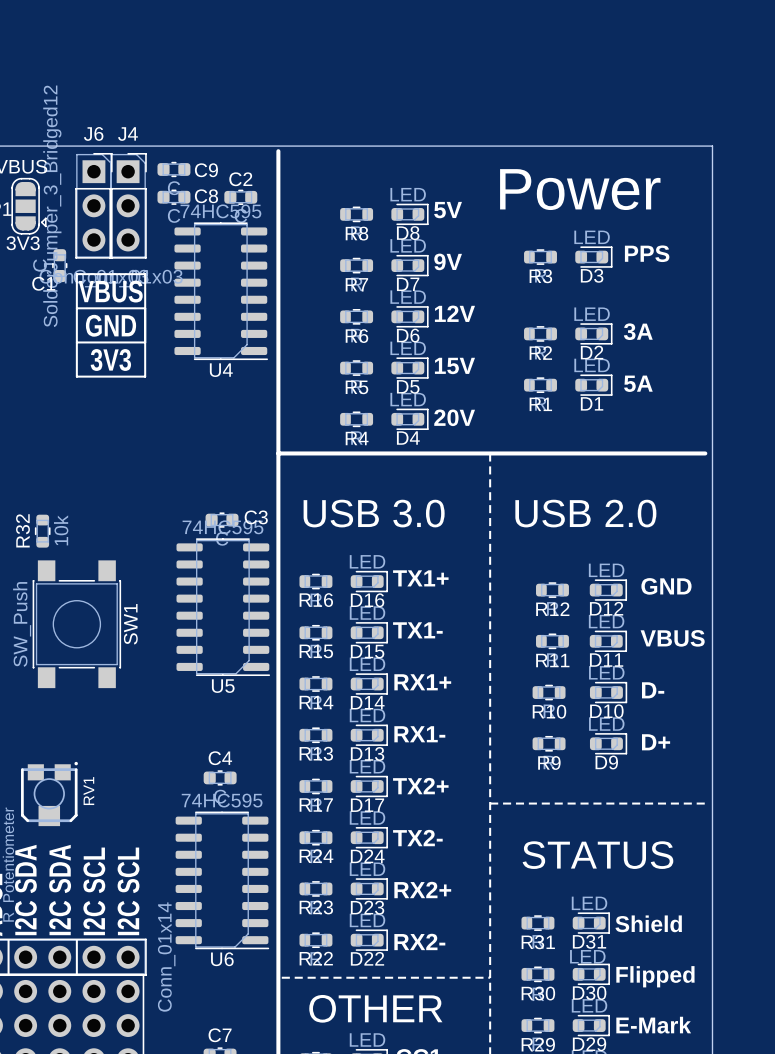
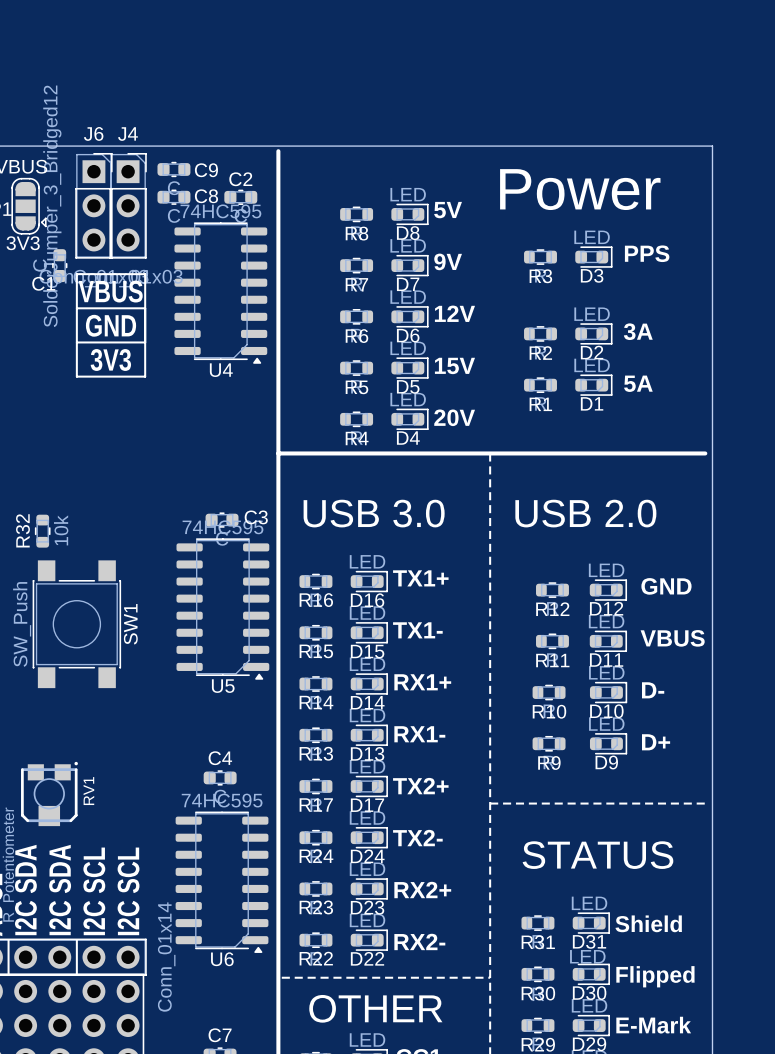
U4 footprint: [174, 222, 269, 361] -> [174, 222, 268, 364]
U5 footprint: [176, 538, 271, 677] -> [176, 538, 270, 680]
U6 footprint: [175, 811, 270, 950] -> [175, 811, 269, 953]

